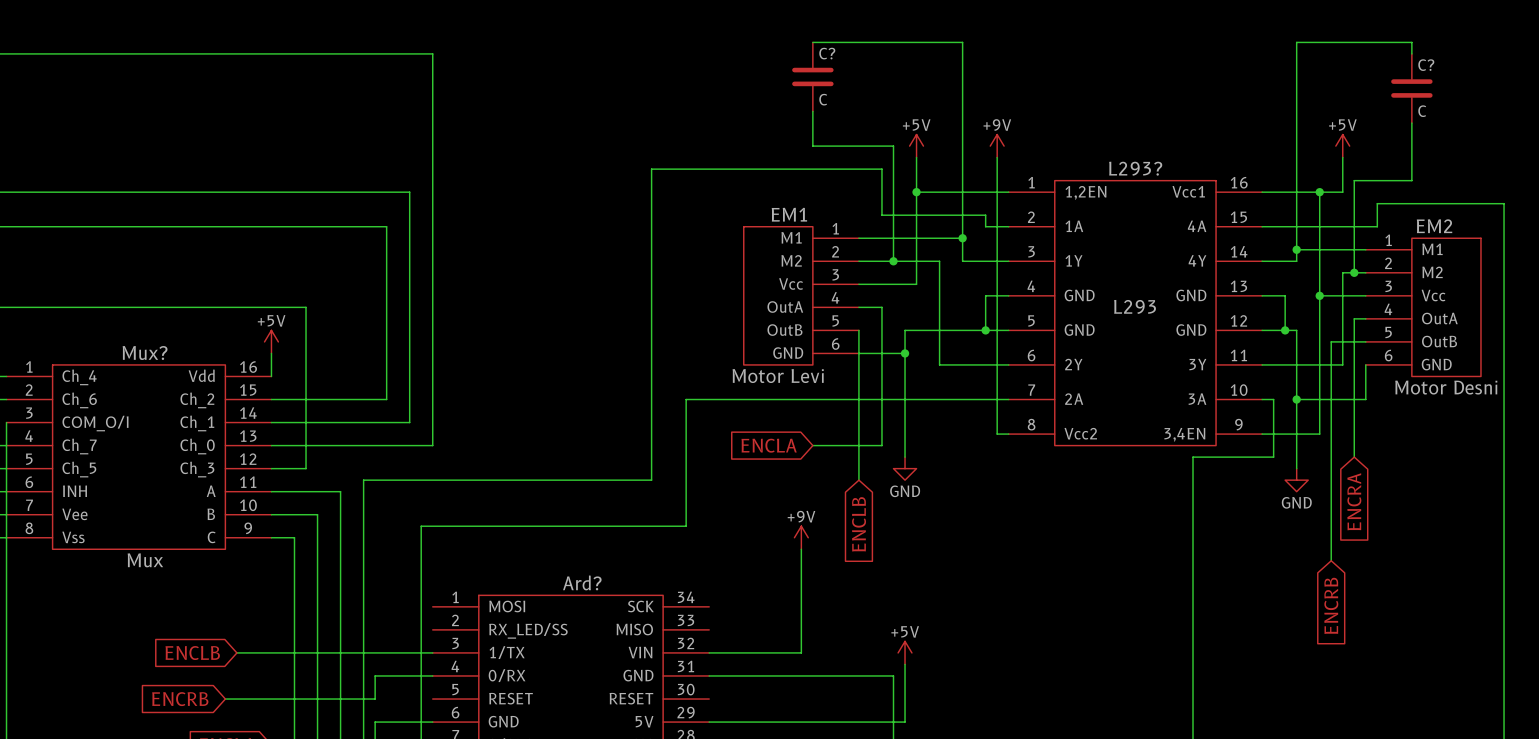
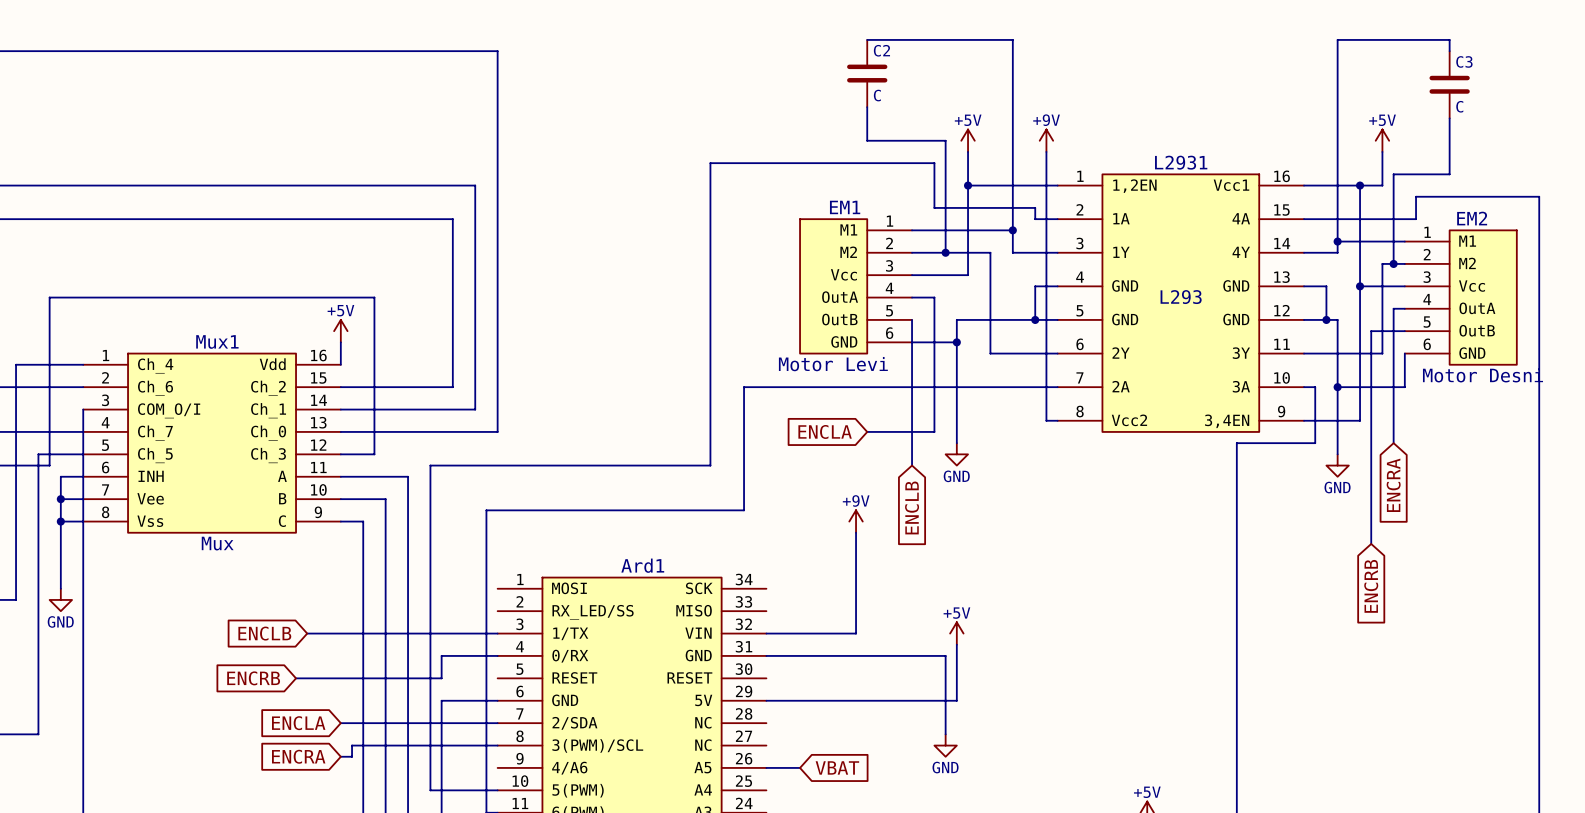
C? name: C? (827, 53) -> C2 (881, 50)
C? name: C? (1426, 65) -> C3 (1464, 61)
L293? name: L293? (1135, 168) -> L2931 (1181, 162)
Mux? name: Mux? (145, 353) -> Mux1 (217, 341)
Ard? name: Ard? (582, 582) -> Ard1 (642, 565)

